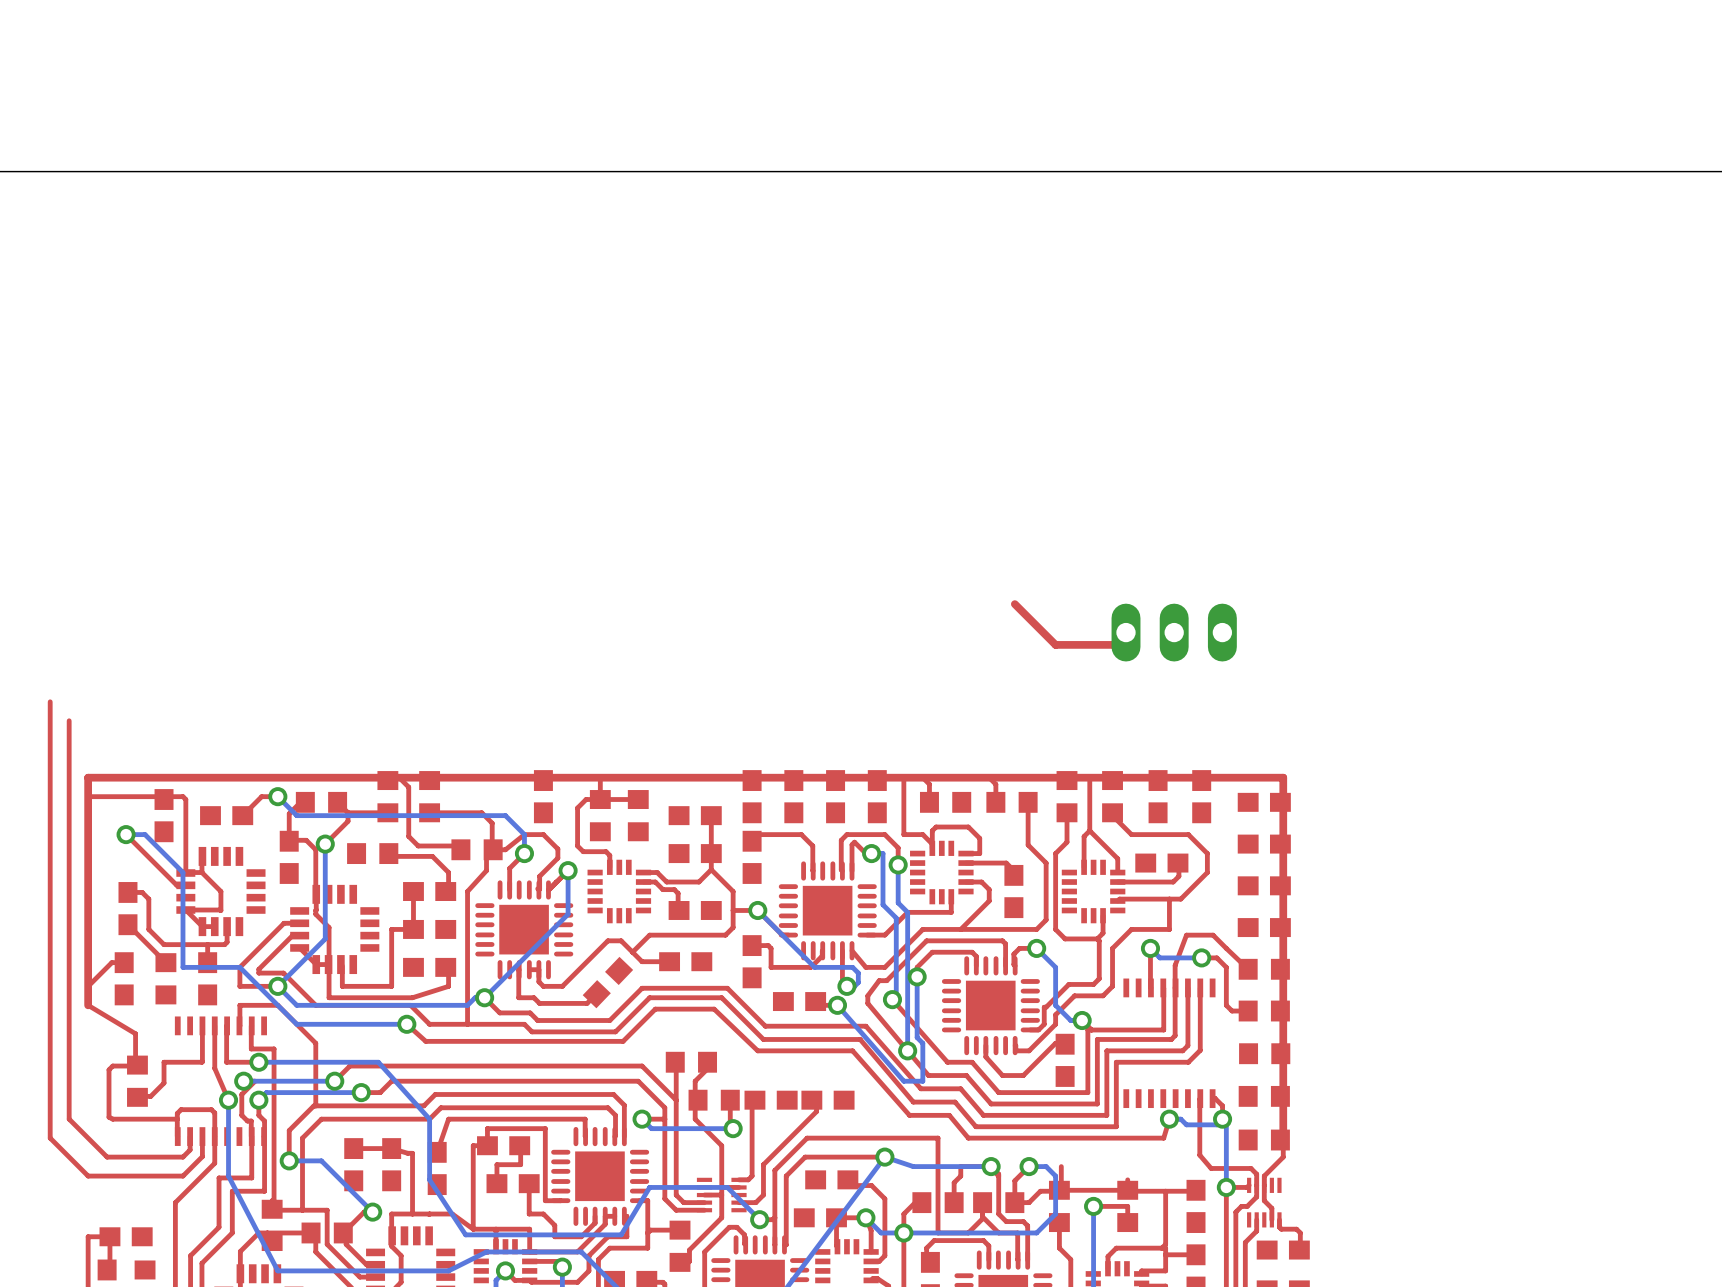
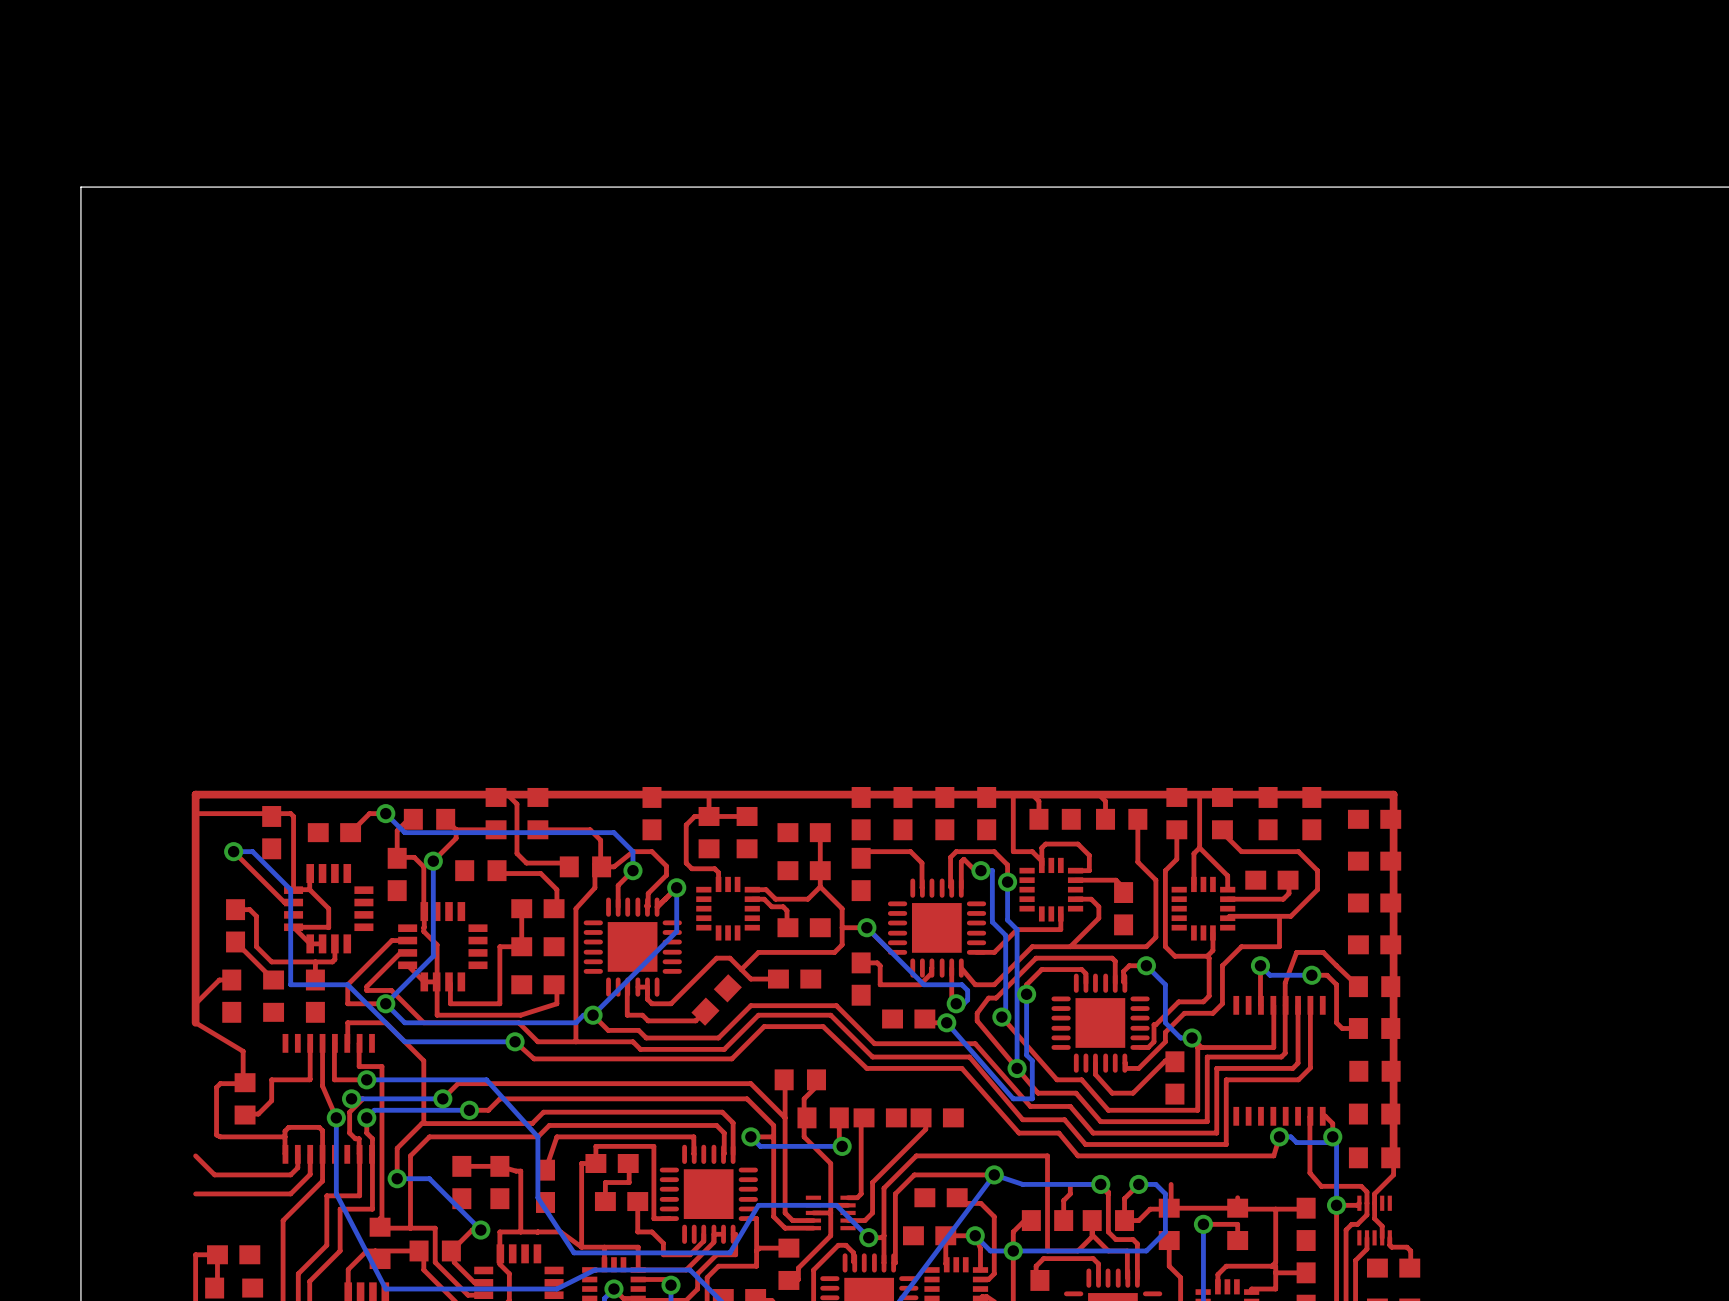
top track: (1014, 604) (1055, 644) (1113, 644) (1126, 632) -> none
part: (1174, 632) -> none
top track: (50, 701) (50, 1138) (88, 1176) -> none
top track: (69, 720) (69, 1119) (88, 1138) -> none

